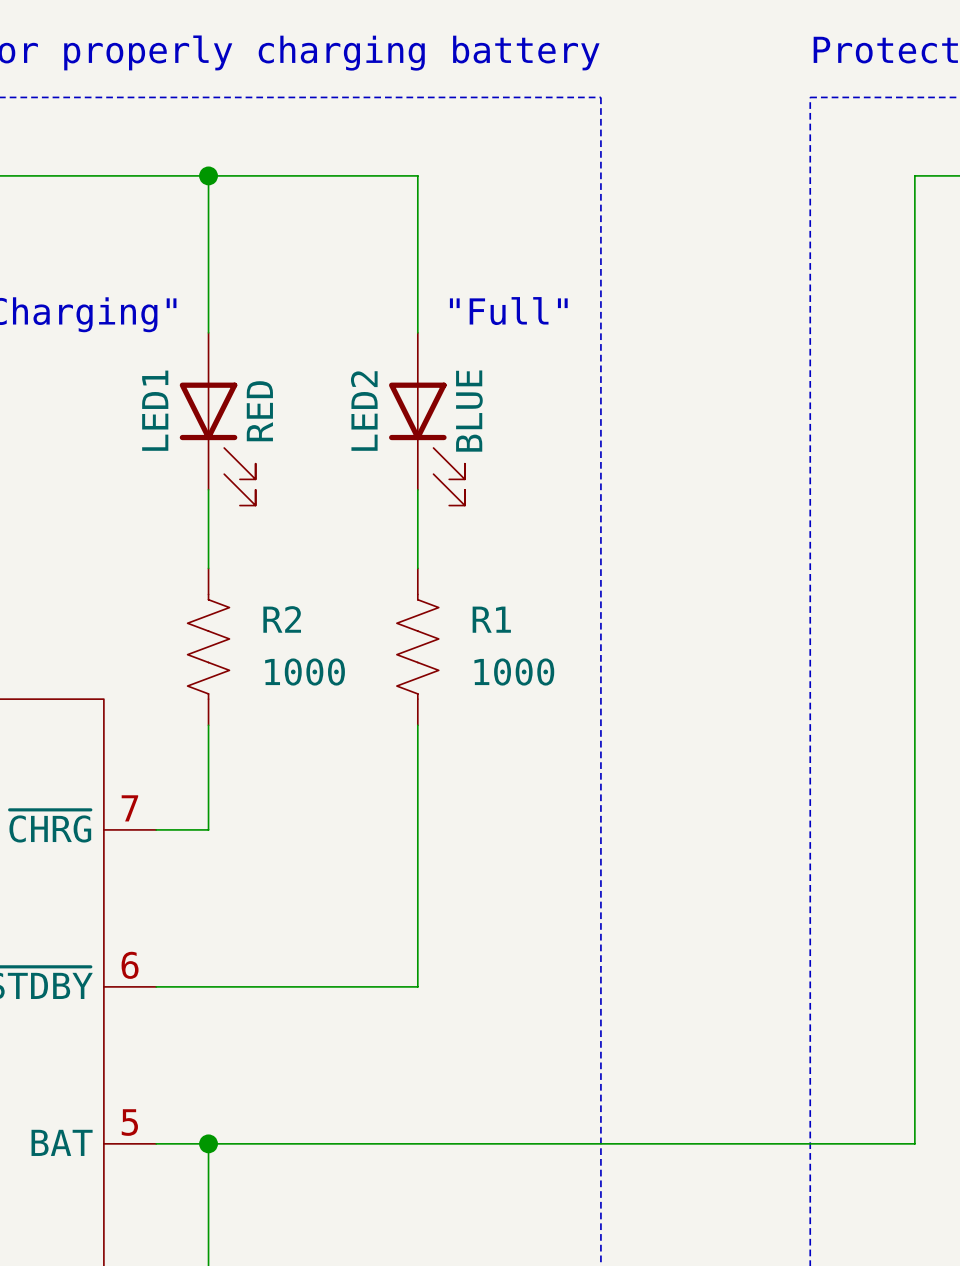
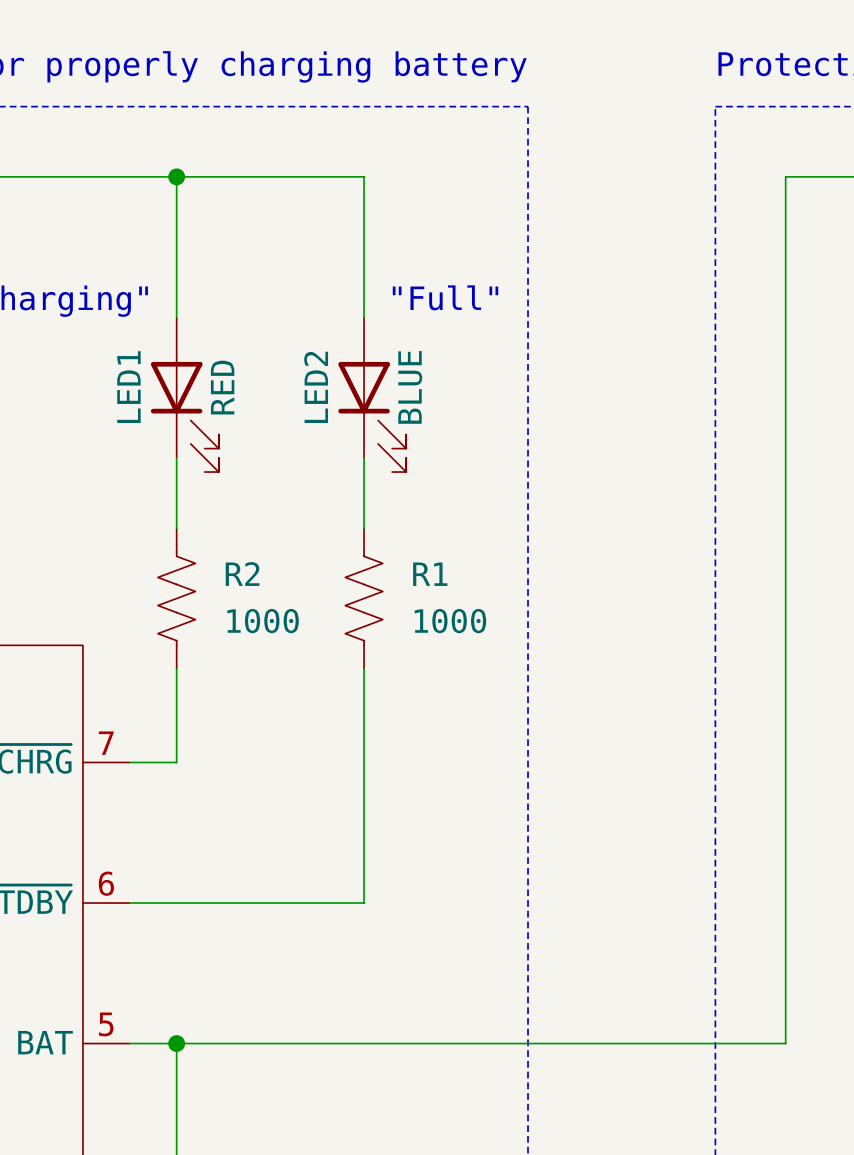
wire: (914, 175) (914, 1143) (888, 1143) -> (809, 176) (785, 176) (785, 1043)

